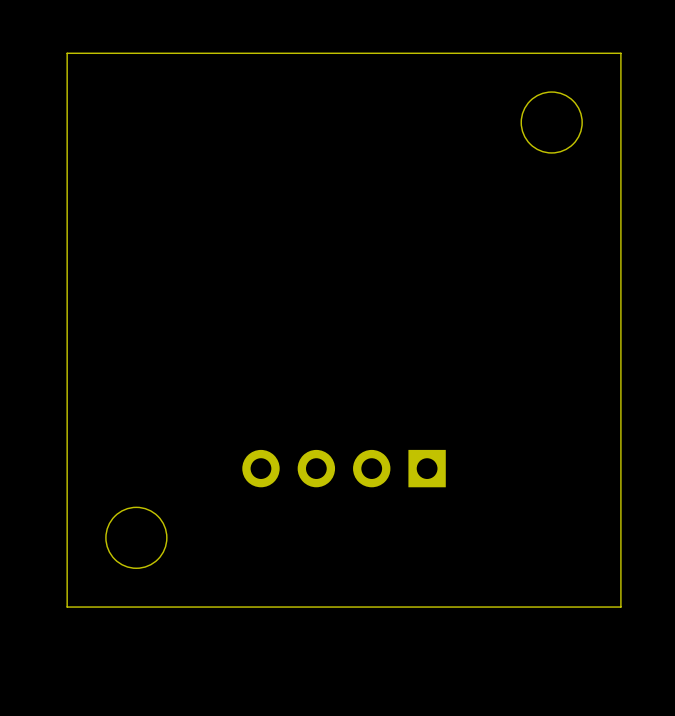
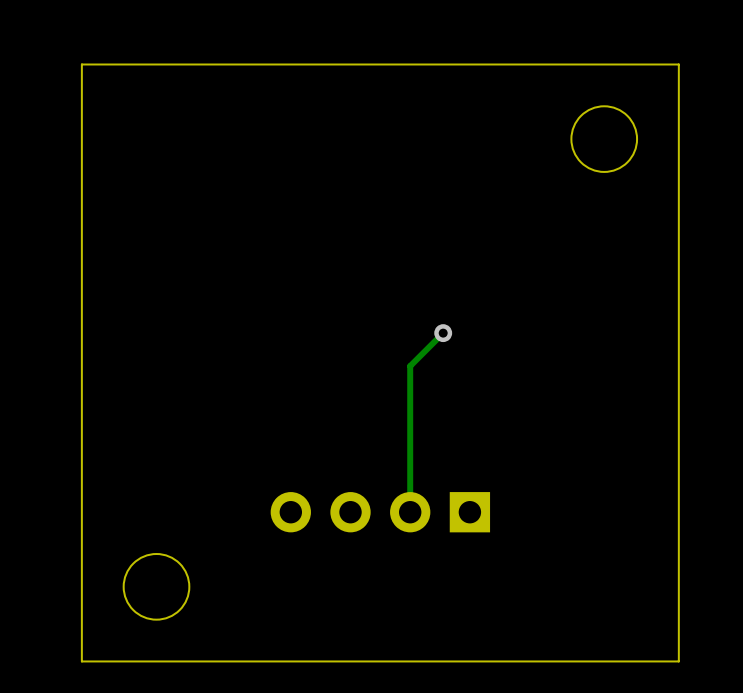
track: none -> (443, 333) (410, 366) (410, 512)
via: none -> (443, 333)

